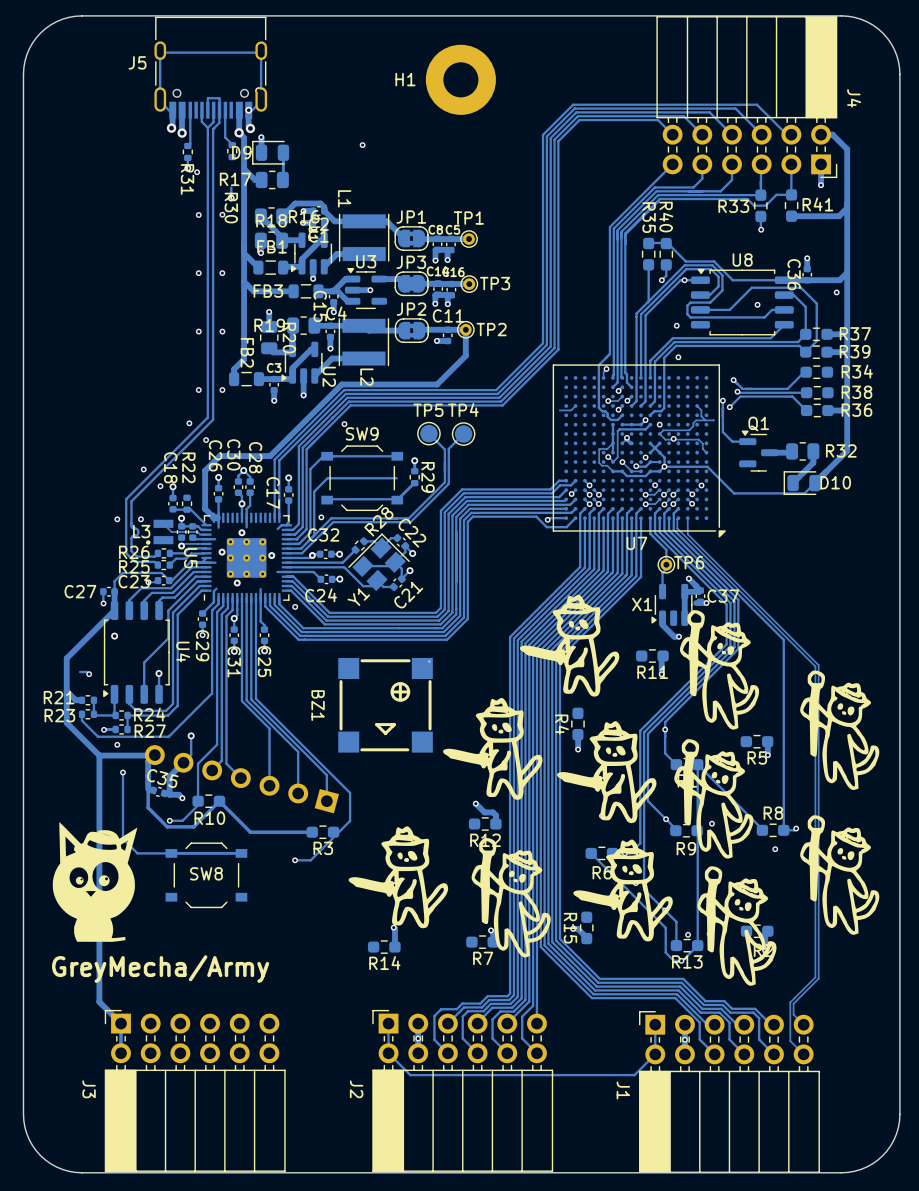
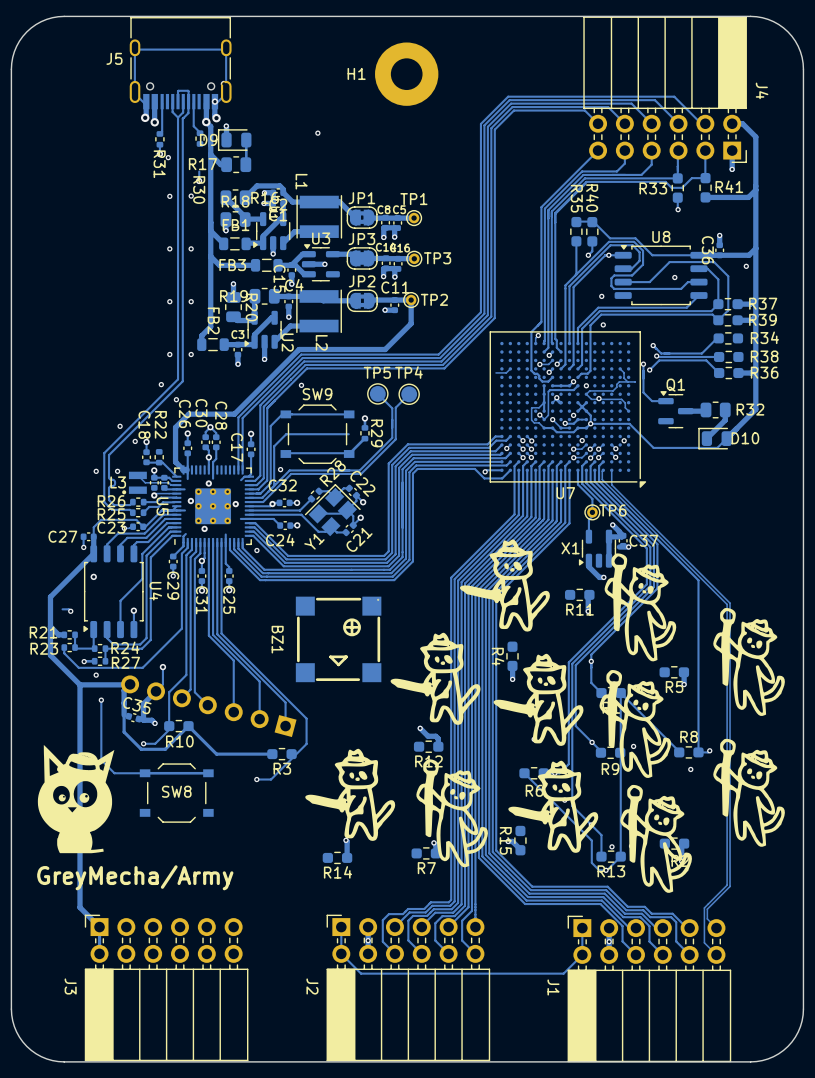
track: none -> (527, 436) (531, 440)
via: none -> (531, 440)

